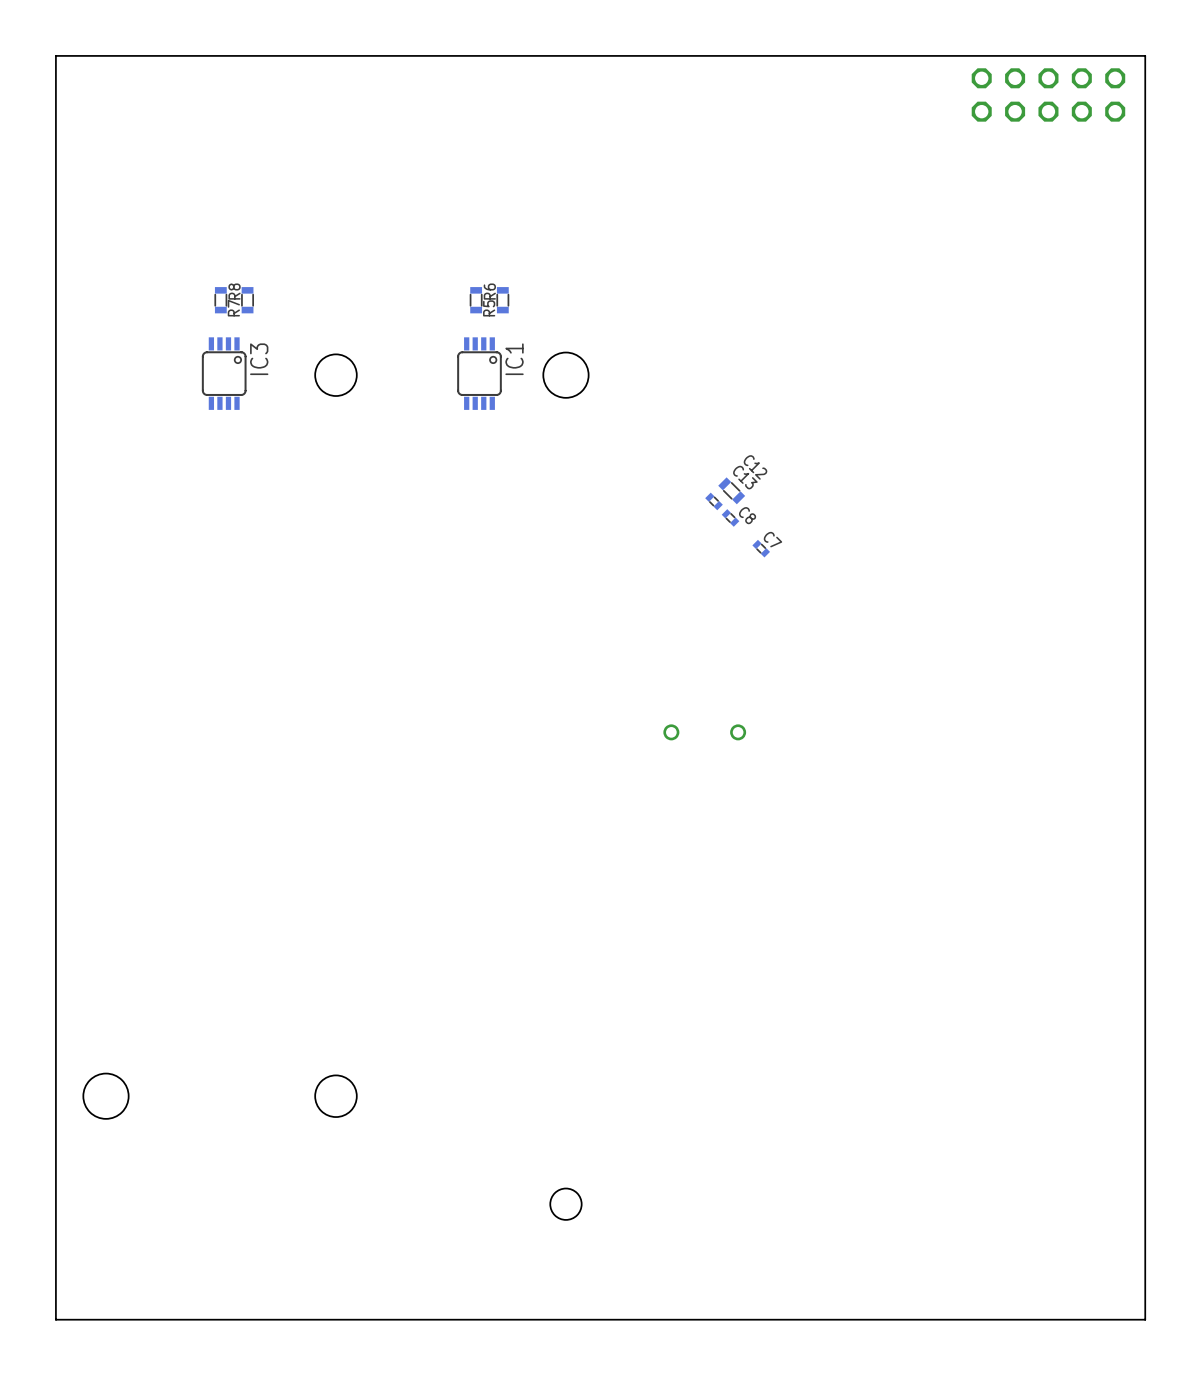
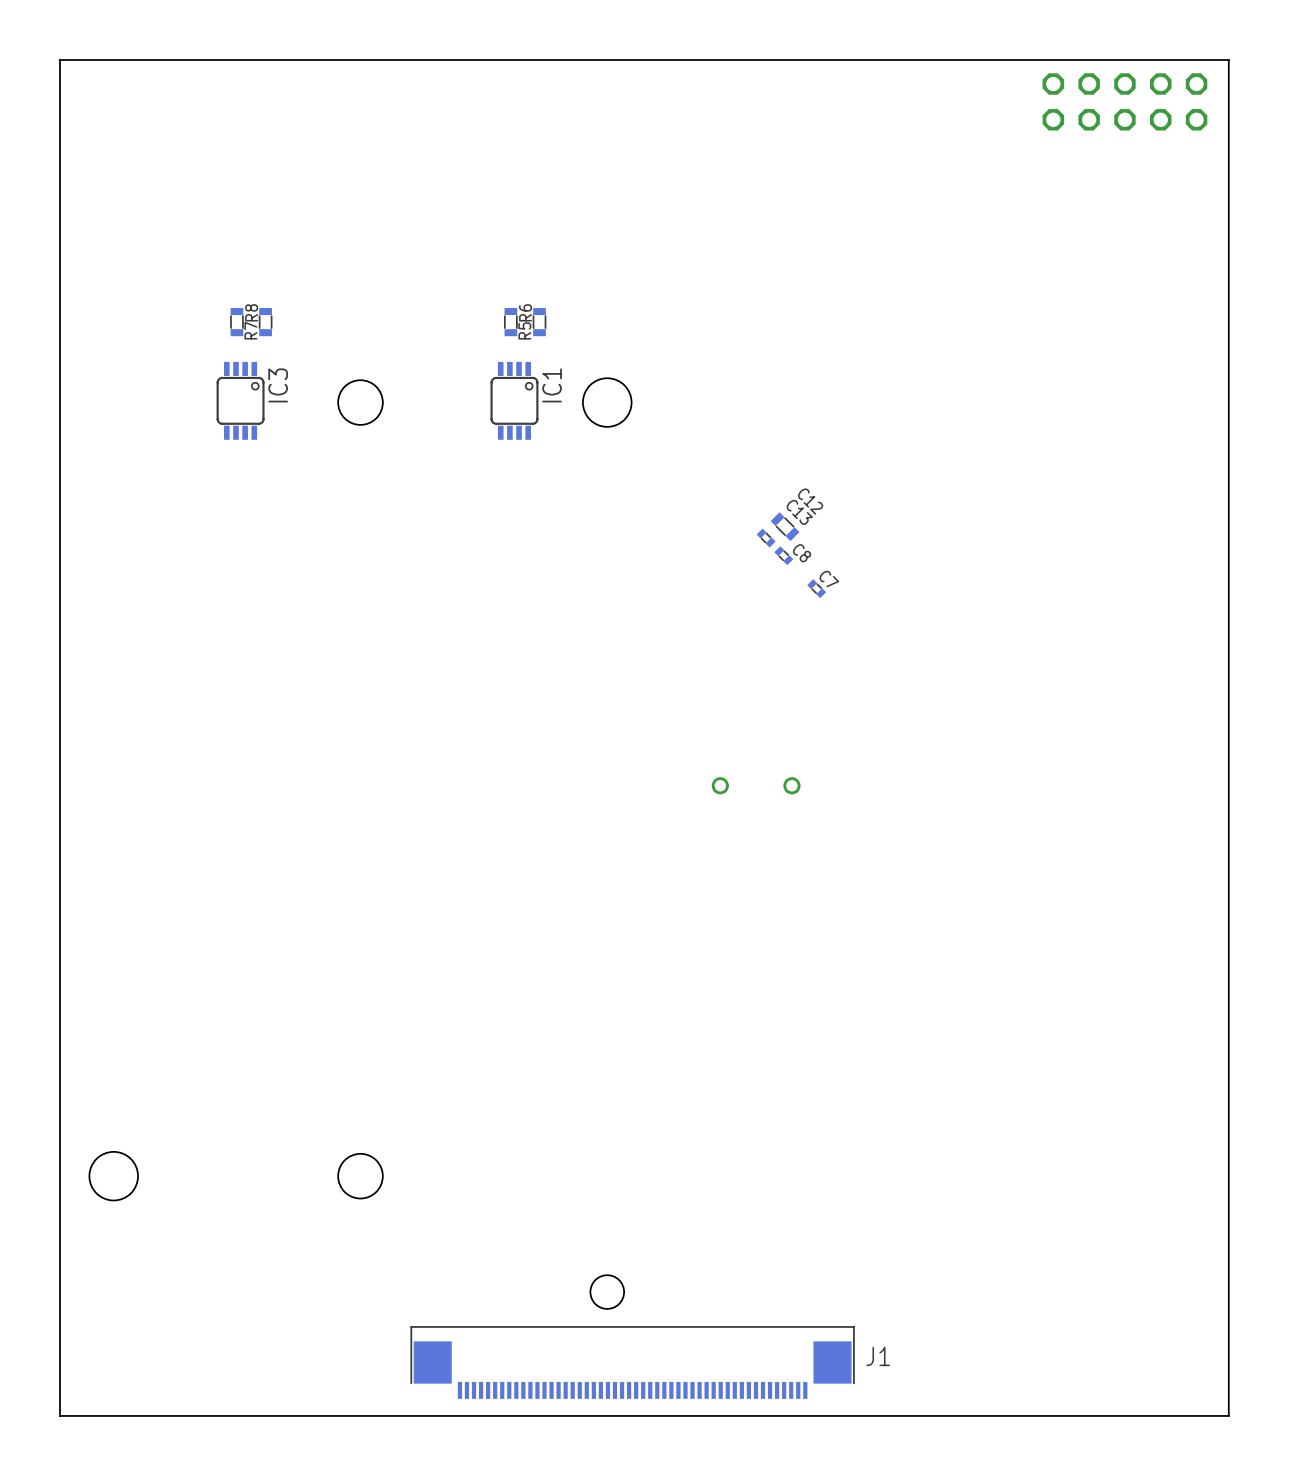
J1: none -> (632, 1362)

